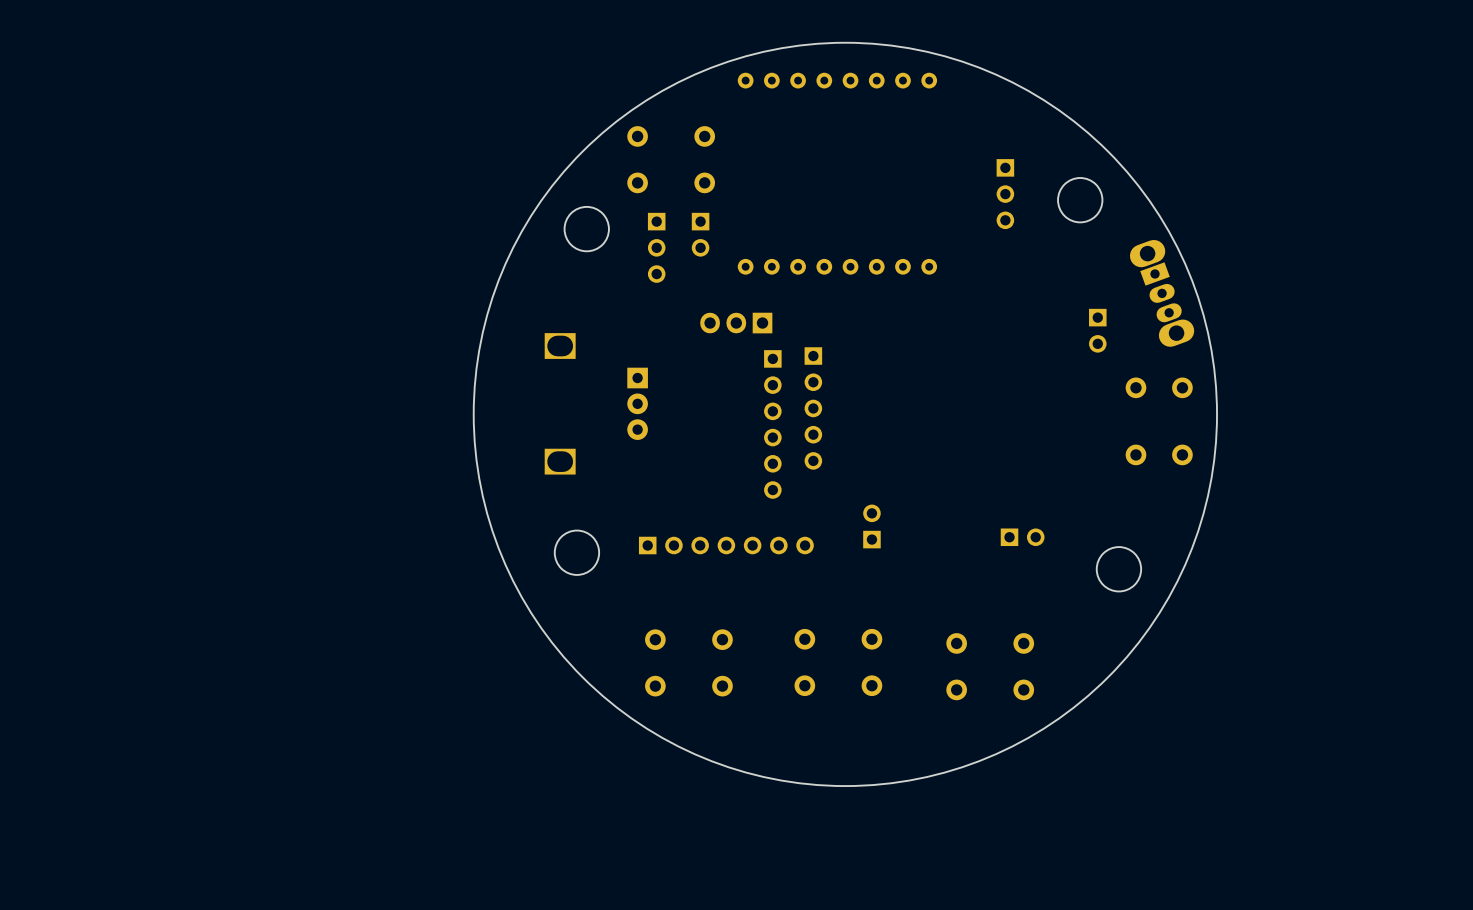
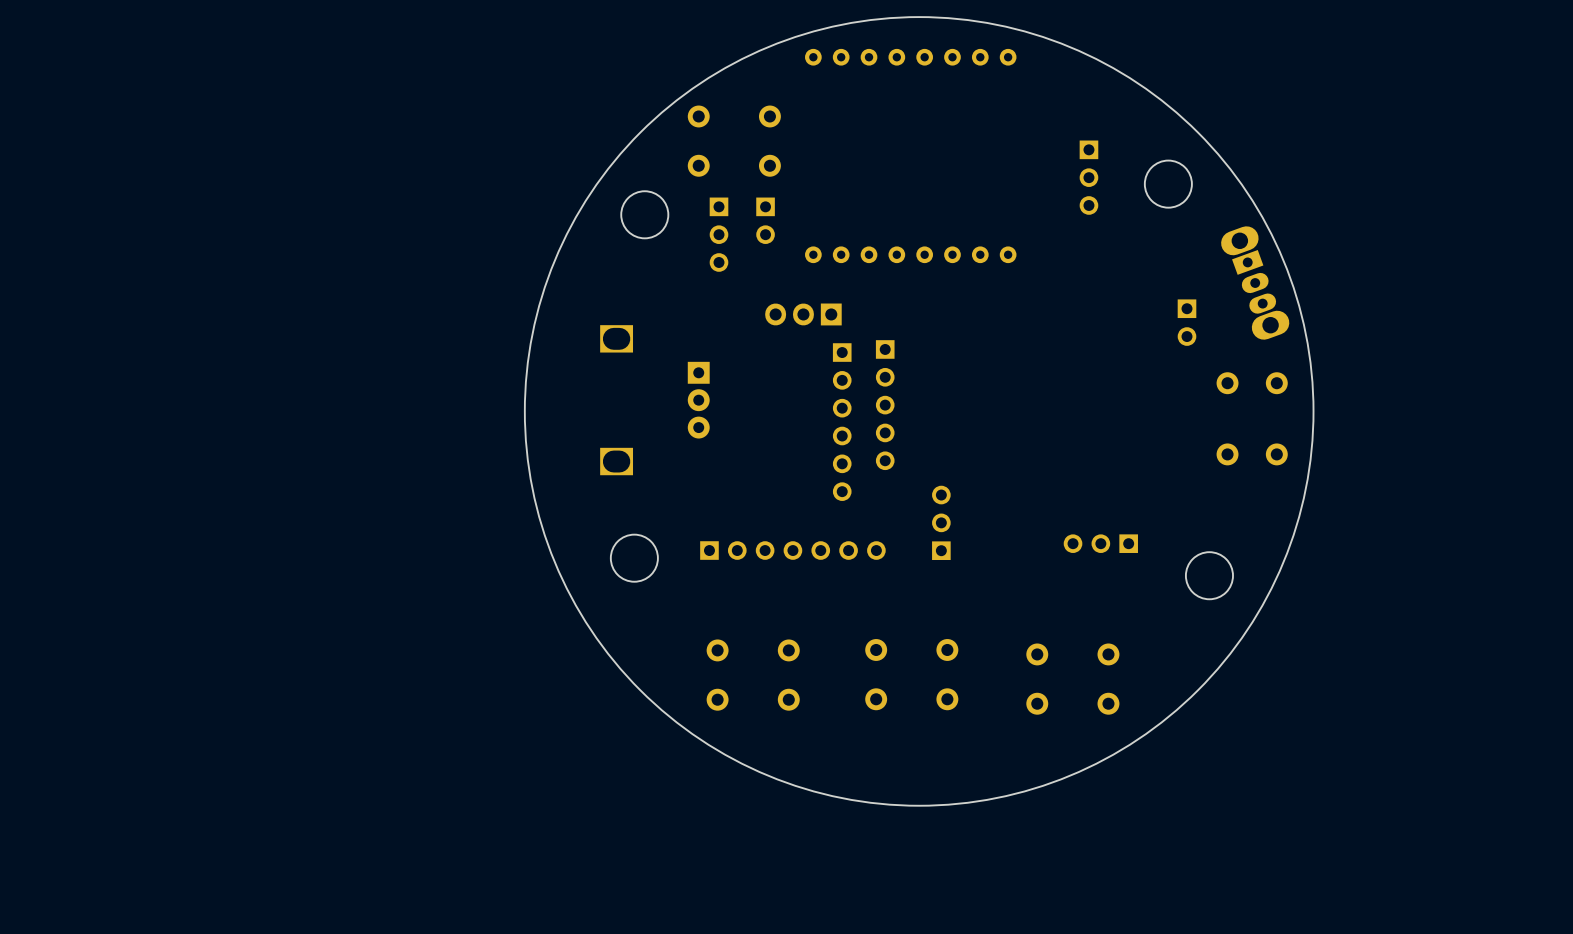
part footprint: [863, 504, 881, 549] -> [932, 485, 951, 561]
part footprint: [1000, 528, 1045, 547] -> [1063, 534, 1138, 553]

